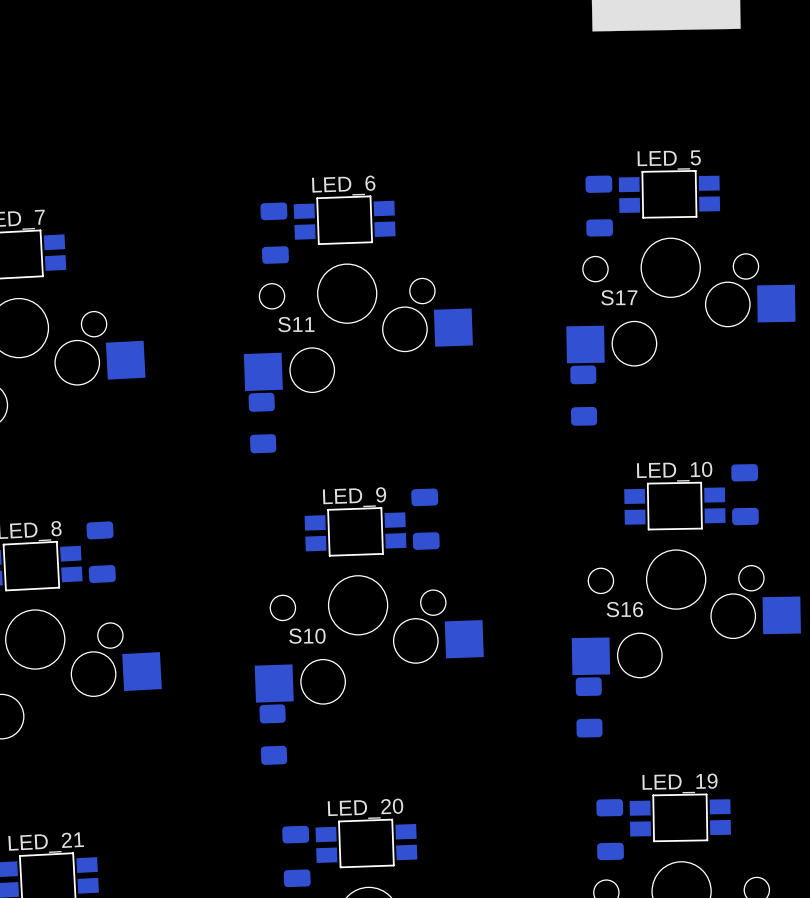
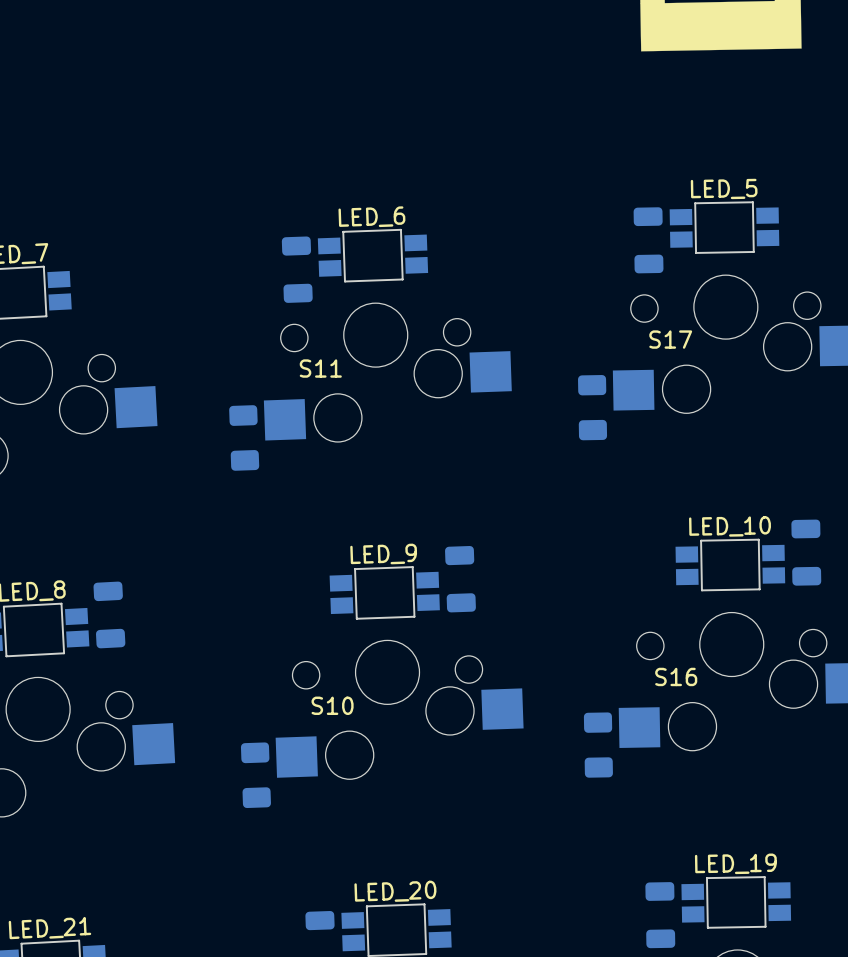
part position: (583, 395) -> (592, 407)
part position: (262, 422) -> (244, 437)
part position: (589, 707) -> (598, 745)
part position: (273, 734) -> (255, 775)

